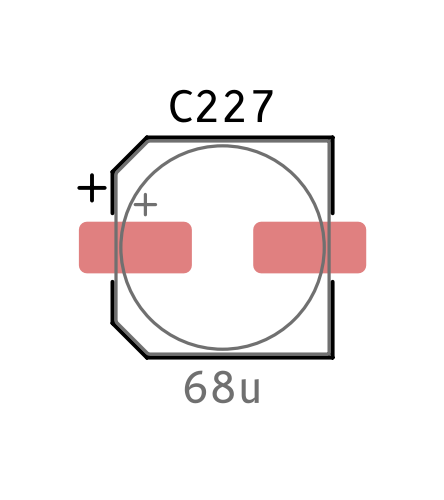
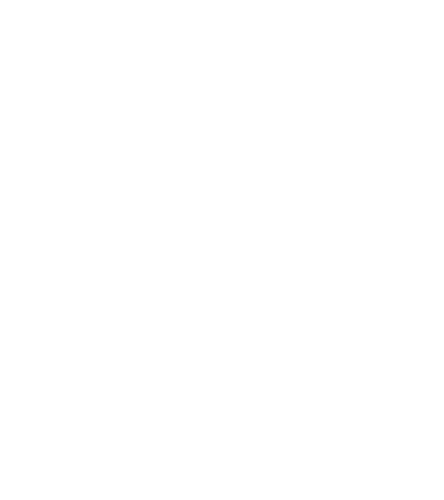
C227: 68u (221, 247) -> none

